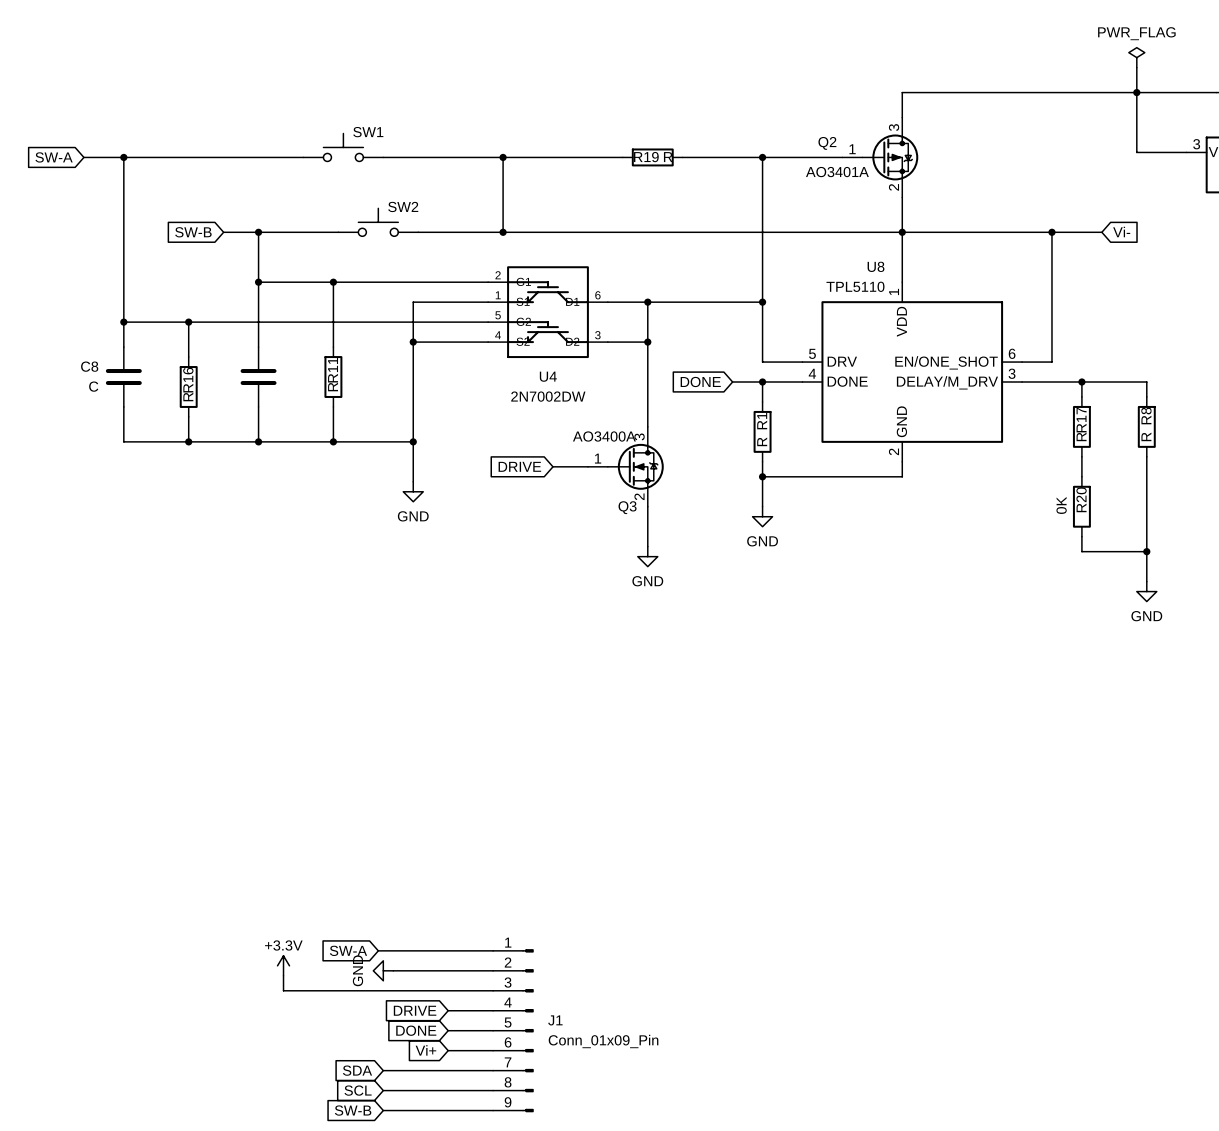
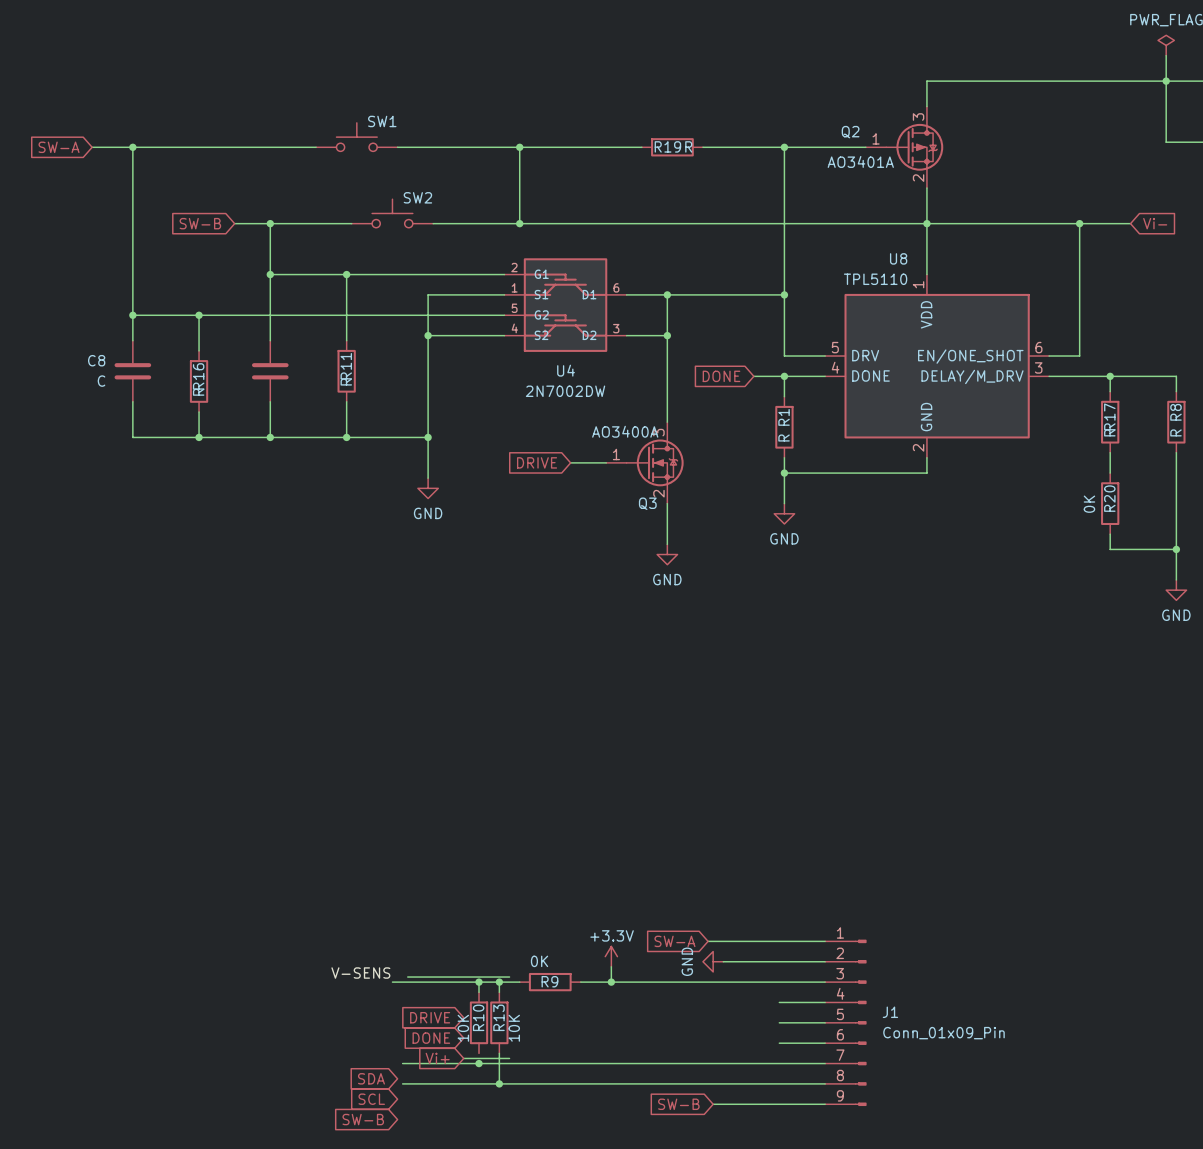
global label: none -> SW-A (674, 941)
wire: none -> (708, 941) (825, 941)
global label: SW-A (348, 950) -> none
wire: (378, 950) (493, 950) -> none
power symbol: none -> +3.3V (611, 956)
power symbol: none -> GND (713, 961)
wire: none -> (723, 961) (825, 961)
wire: none -> (611, 966) (611, 982)
power symbol: +3.3V (283, 965) -> none
label: none -> V-SENS (360, 973)
power symbol: GND (383, 970) -> none
wire: (283, 975) (283, 990) (493, 990) -> none
wire: none -> (392, 982) (519, 982)
wire: none -> (479, 982) (479, 992)
junction: none -> (479, 982)
wire: none -> (499, 982) (499, 992)
junction: none -> (499, 982)
R9: none -> 0K (550, 982)
wire: none -> (580, 982) (825, 982)
junction: none -> (611, 982)
wire: none -> (779, 1002) (825, 1002)
wire: (448, 1010) (493, 1010) -> none
R10: none -> 10K (479, 1022)
R13: none -> 10K (499, 1022)
wire: none -> (779, 1022) (825, 1022)
wire: (448, 1030) (493, 1030) -> none
J1 position: (513, 1030) -> (845, 1022)
wire: none -> (779, 1043) (825, 1043)
wire: none -> (499, 1053) (499, 1083)
wire: none -> (402, 1063) (825, 1063)
junction: none -> (479, 1063)
wire: (383, 1070) (493, 1070) -> none
wire: none -> (402, 1083) (825, 1083)
junction: none -> (499, 1083)
wire: (383, 1090) (493, 1090) -> none
global label: none -> SW-B (678, 1104)
wire: none -> (713, 1104) (825, 1104)
wire: (383, 1110) (493, 1110) -> none

